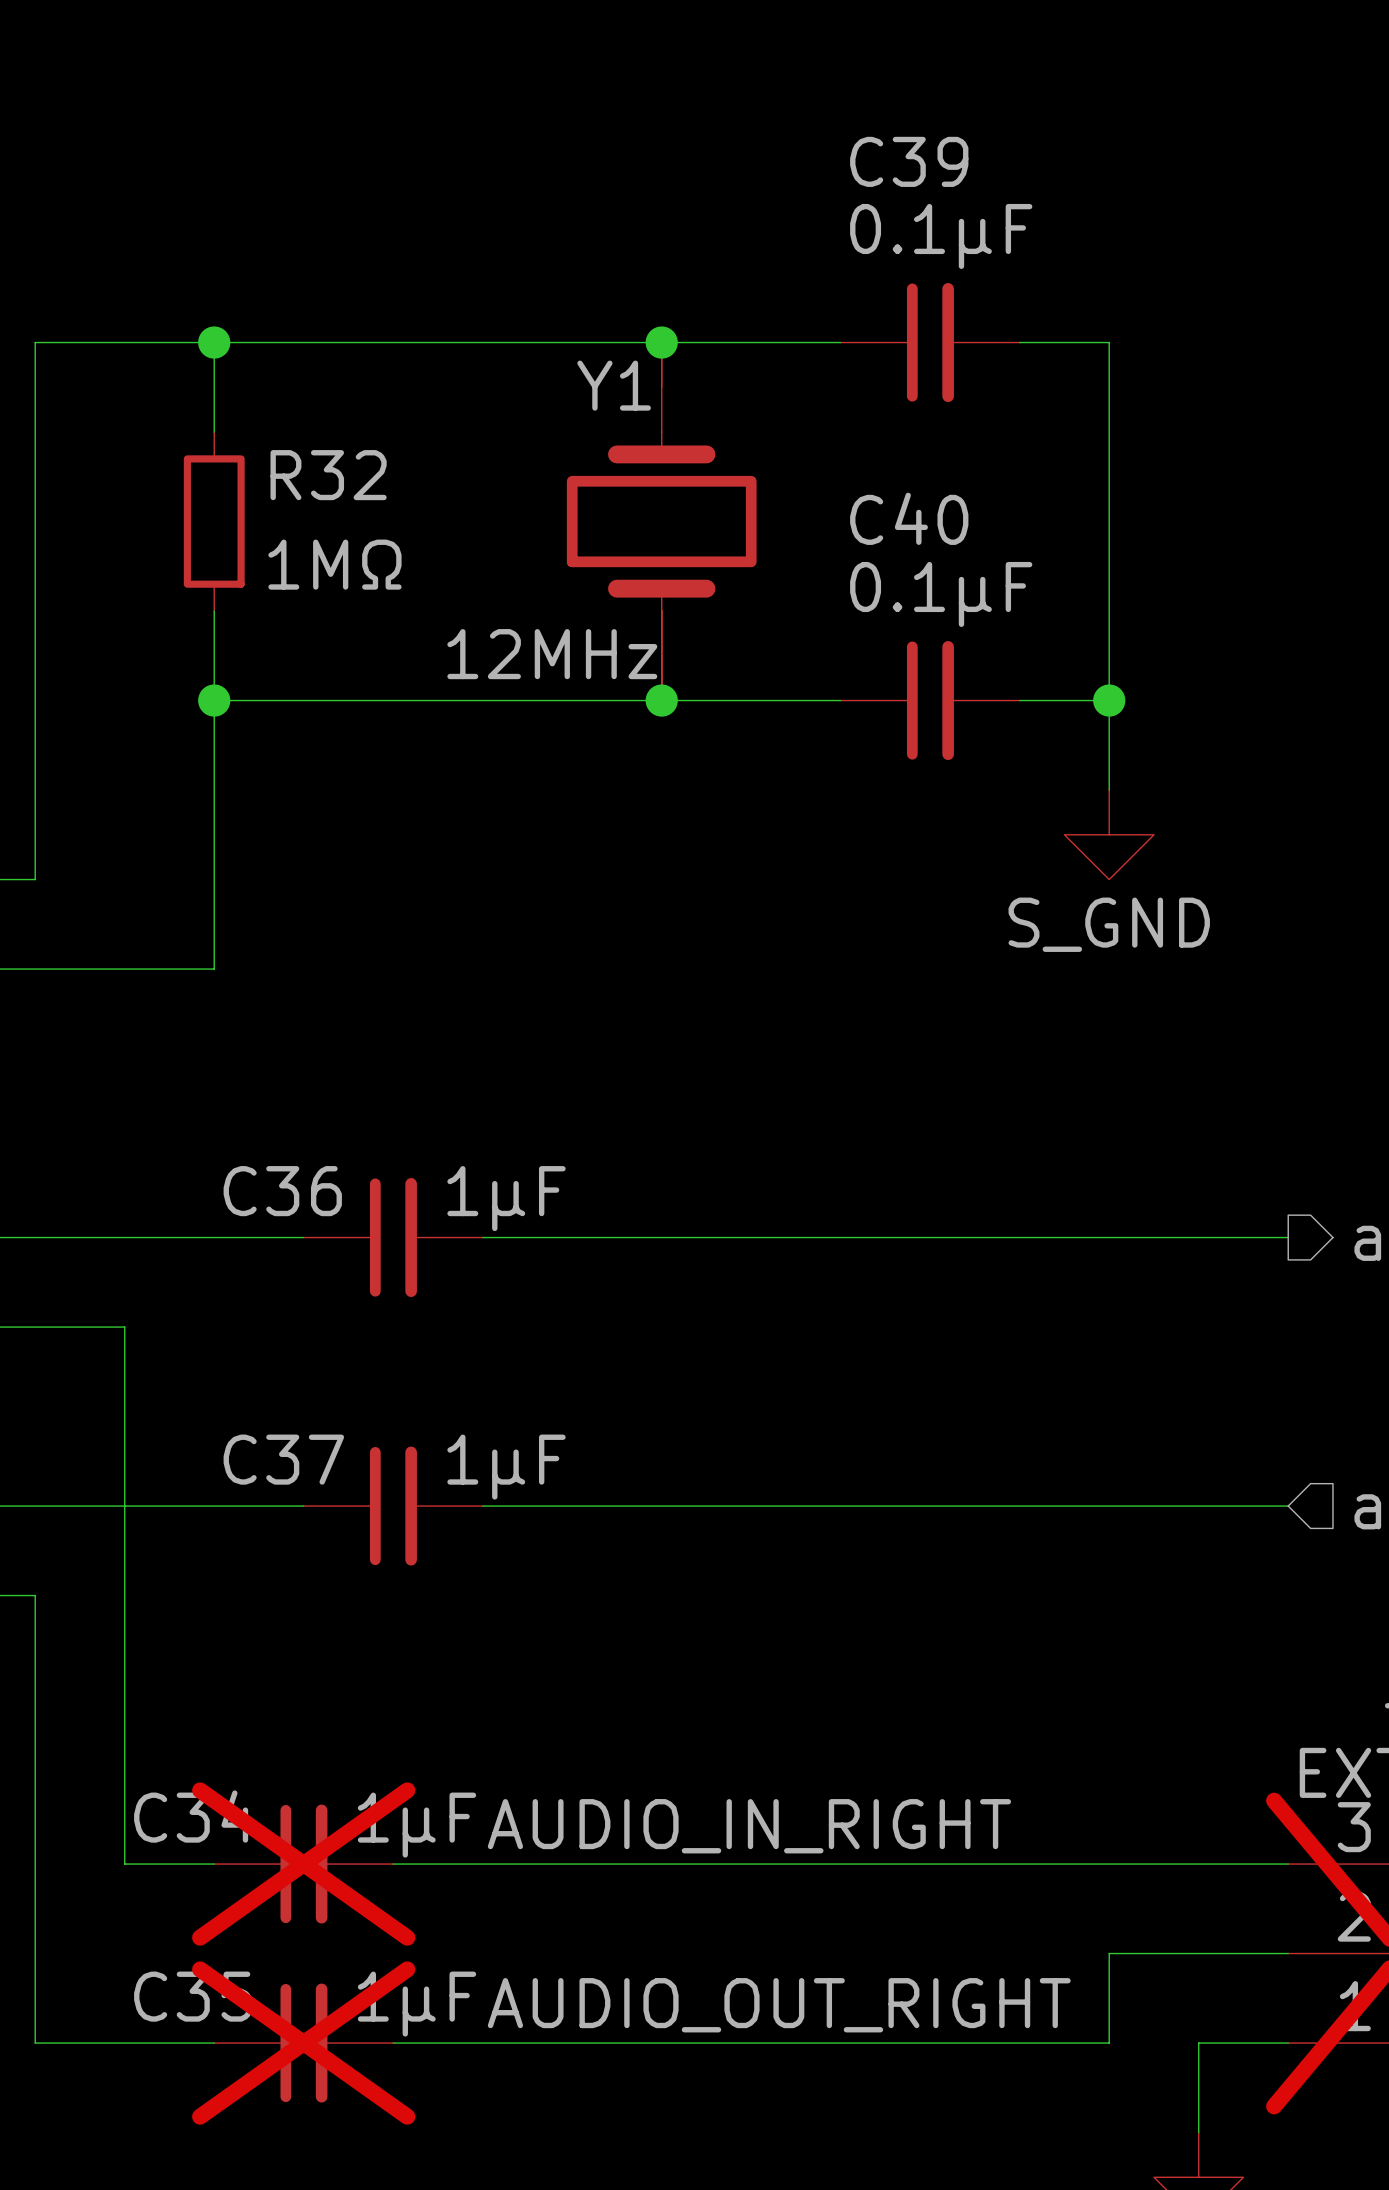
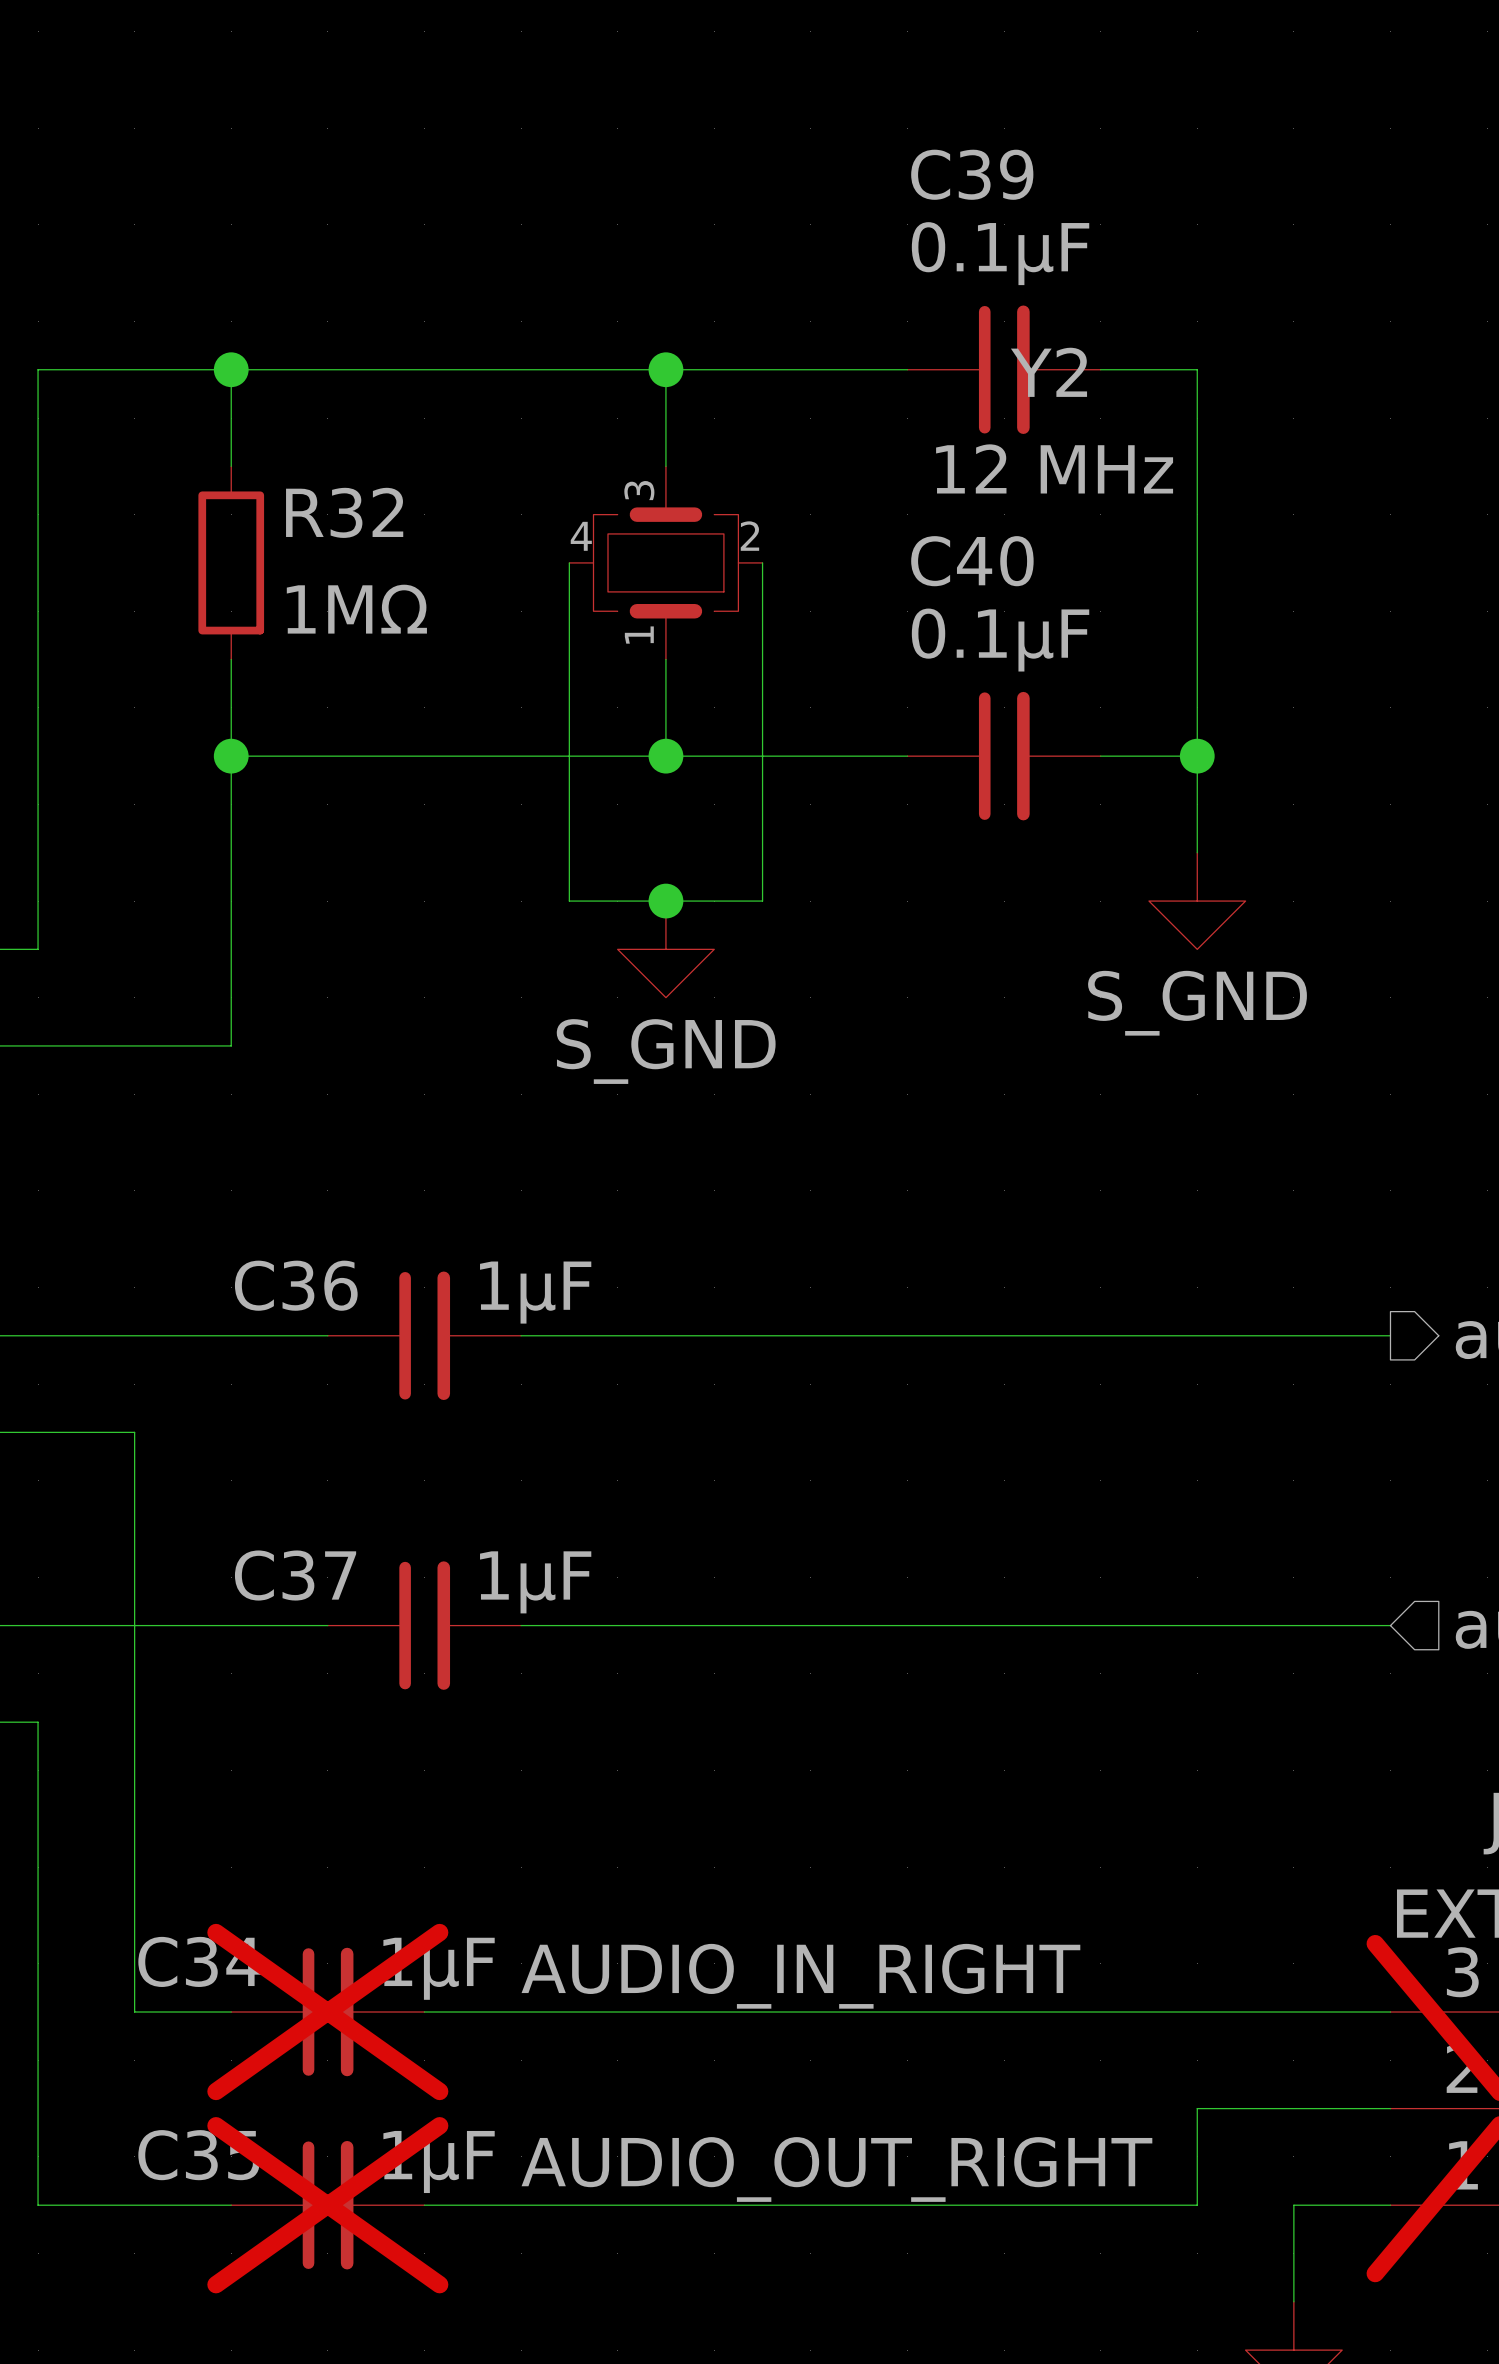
wire: none -> (665, 369) (665, 466)
junction position: (661, 342) -> (665, 369)
wire: none -> (569, 562) (569, 901) (762, 901) (762, 562)
Y2: none -> 12 MHz (665, 562)
Y1: 12MHz (661, 521) -> none
wire: none -> (665, 659) (665, 756)
junction position: (661, 700) -> (665, 756)
junction: none -> (665, 901)
power symbol: none -> S_GND (665, 949)

